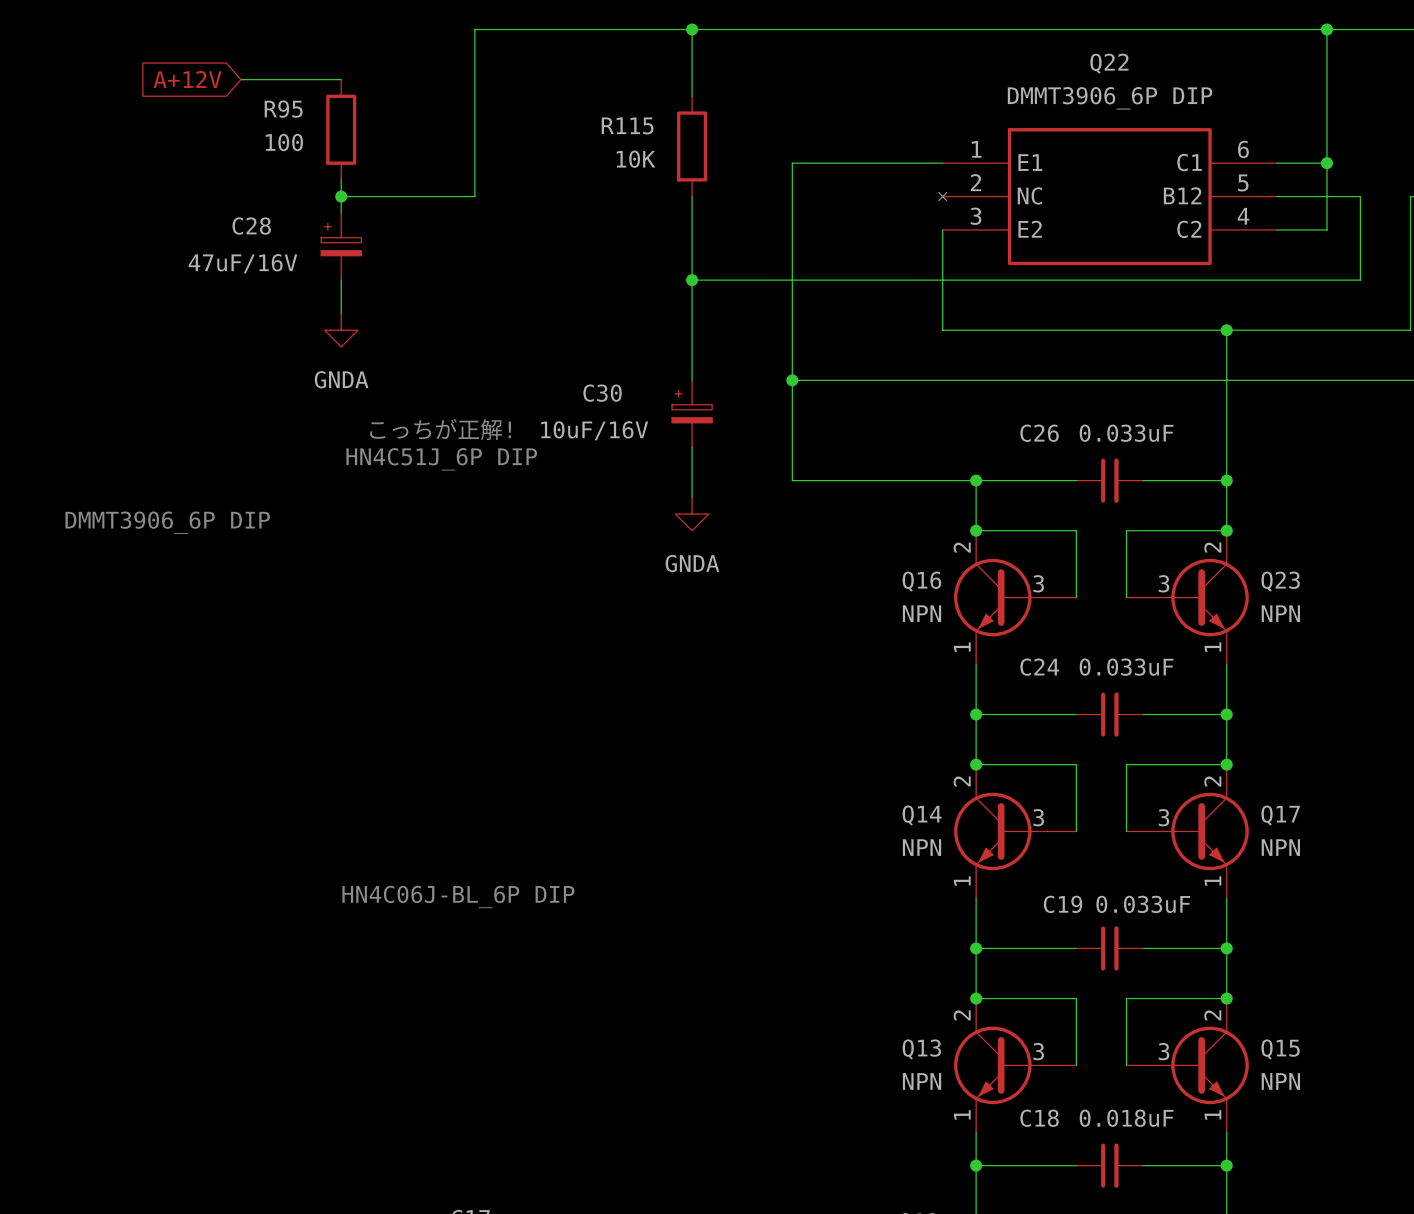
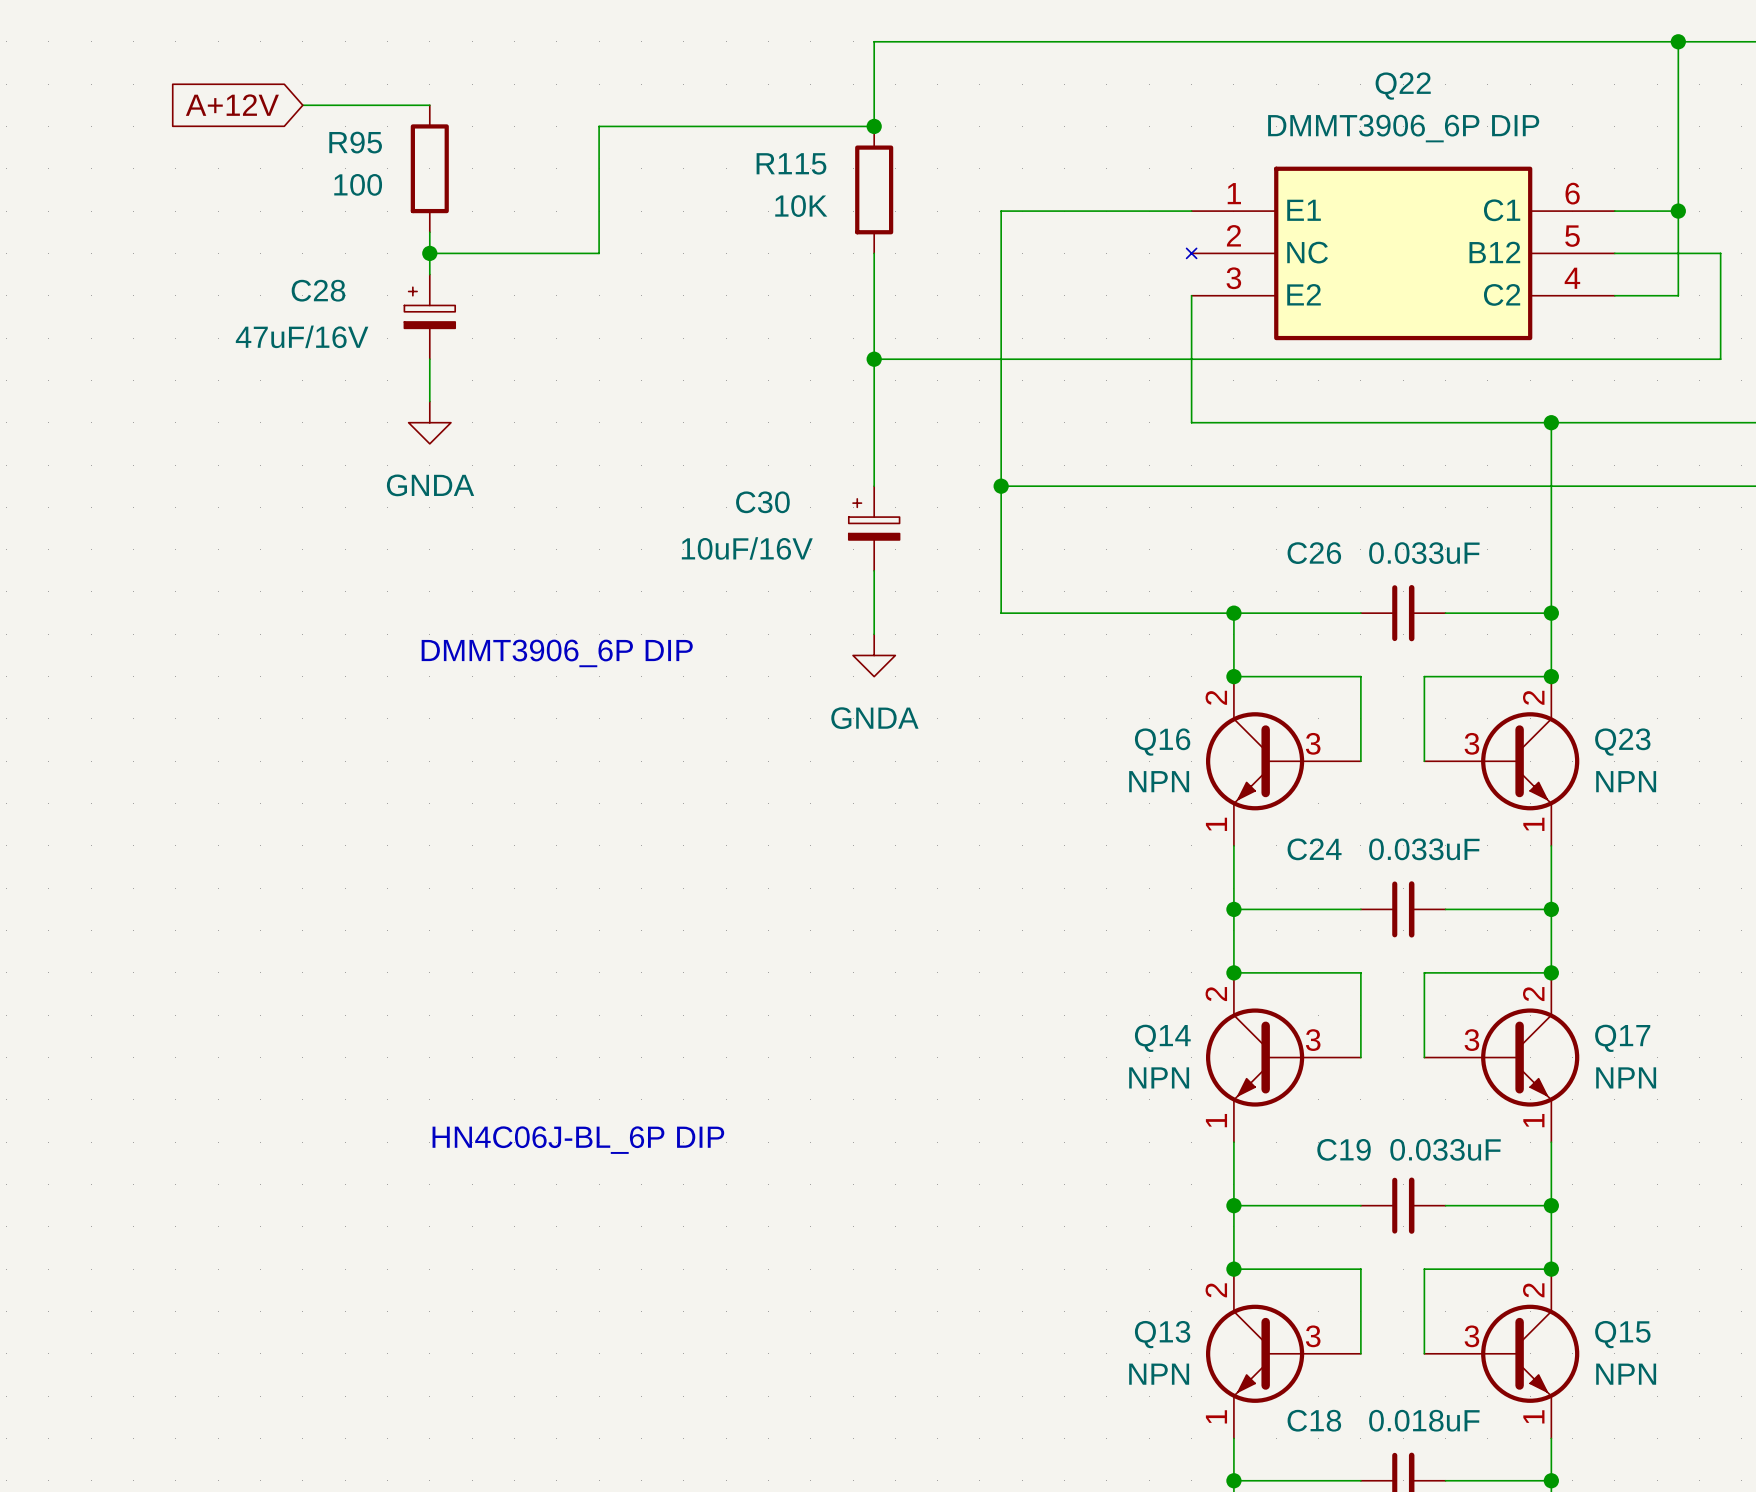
wire: (692, 29) (474, 29) (474, 96) -> (874, 126) (599, 126)
junction position: (692, 29) -> (874, 126)
text: こっちが正解! (440, 429) -> none
text: HN4C51J_6P DIP (441, 459) -> none
text position: DMMT3906_6P DIP (167, 522) -> DMMT3906_6P DIP (557, 653)

